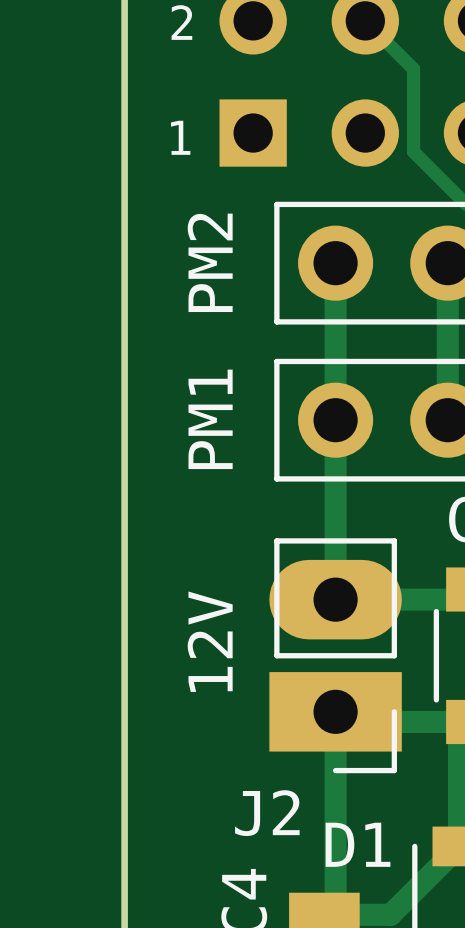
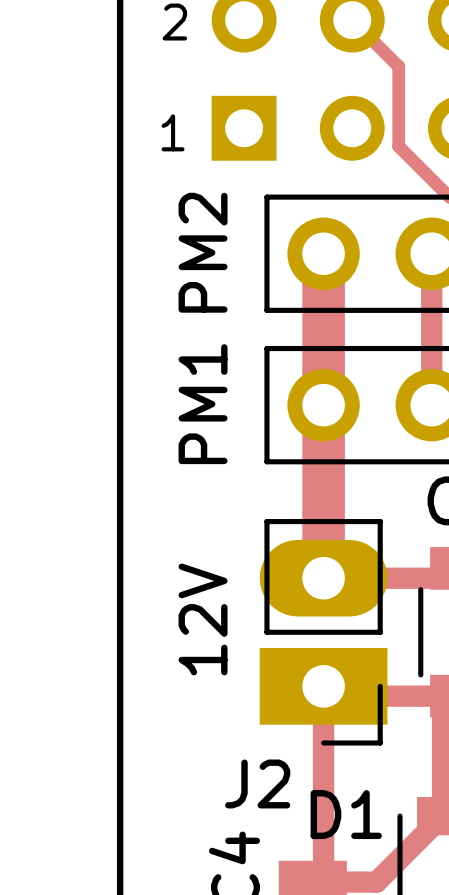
track width: thin (335, 263) (335, 599) -> thick (323, 253) (323, 578)

